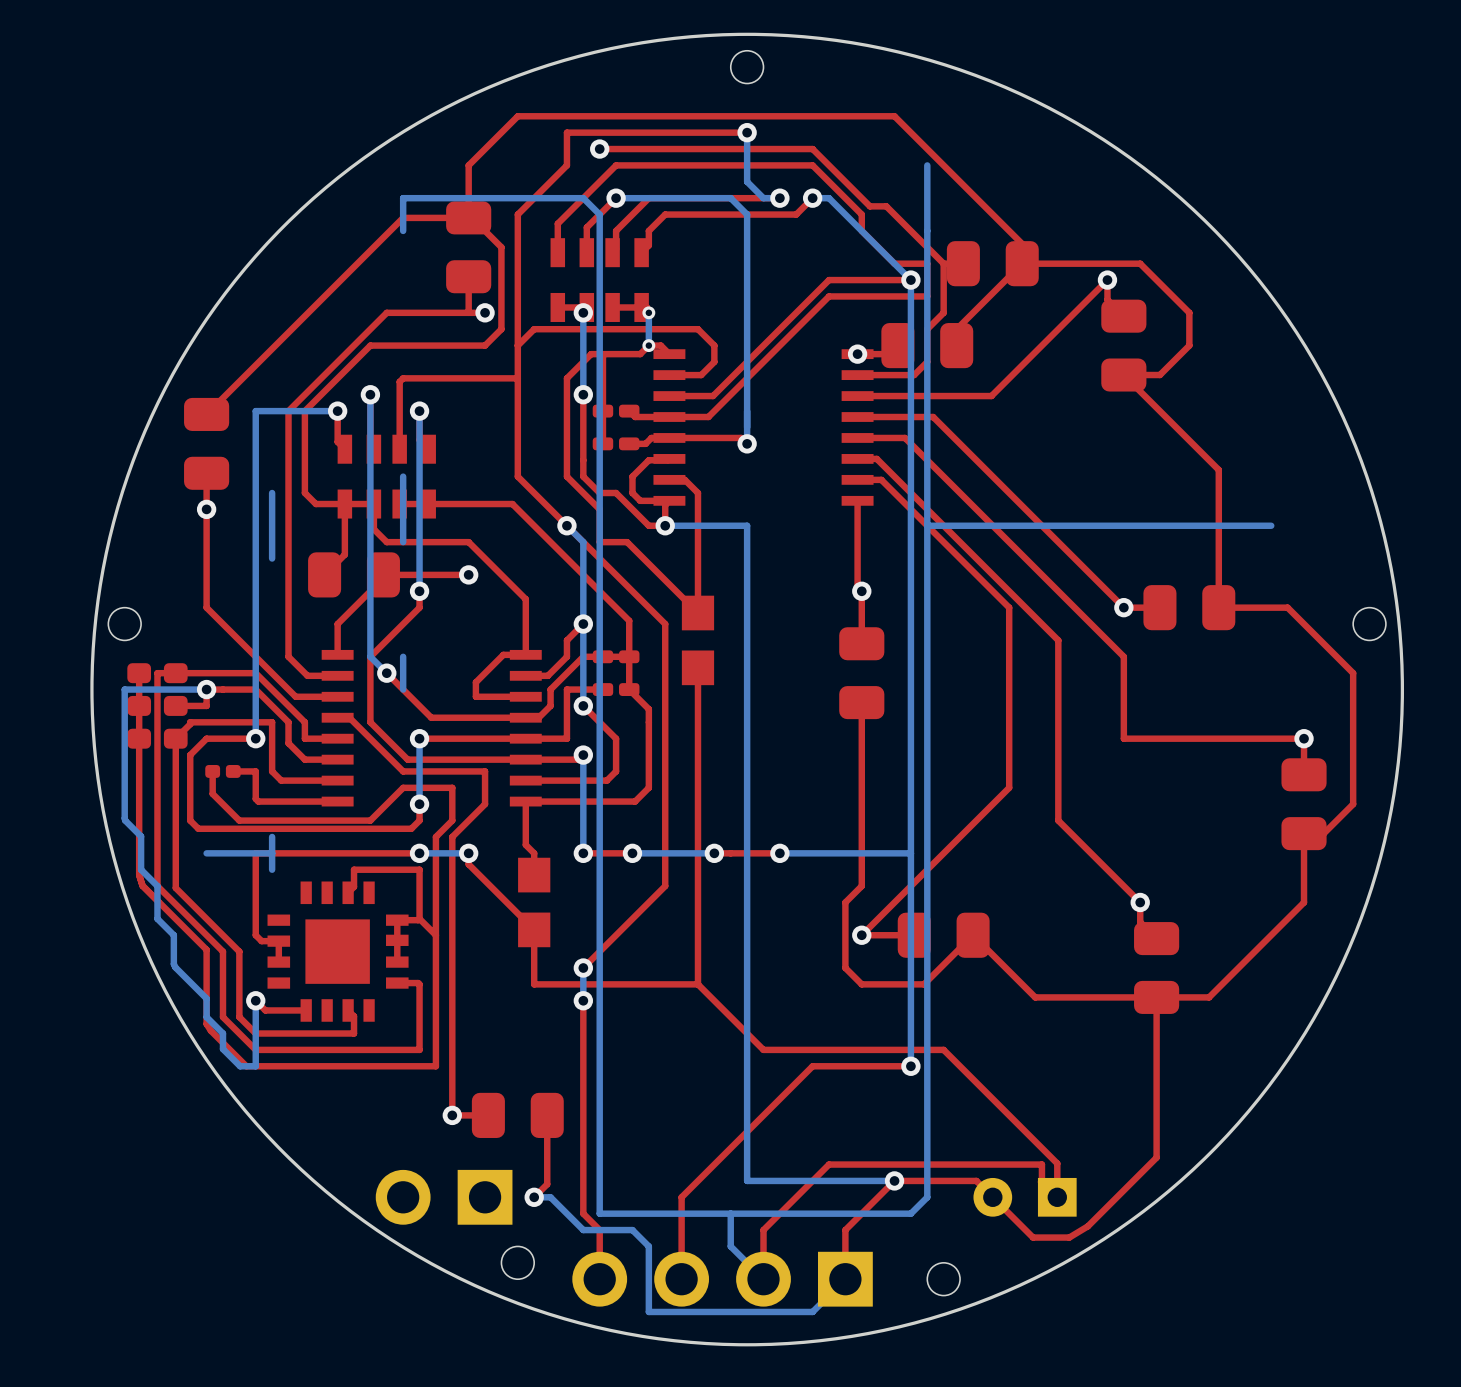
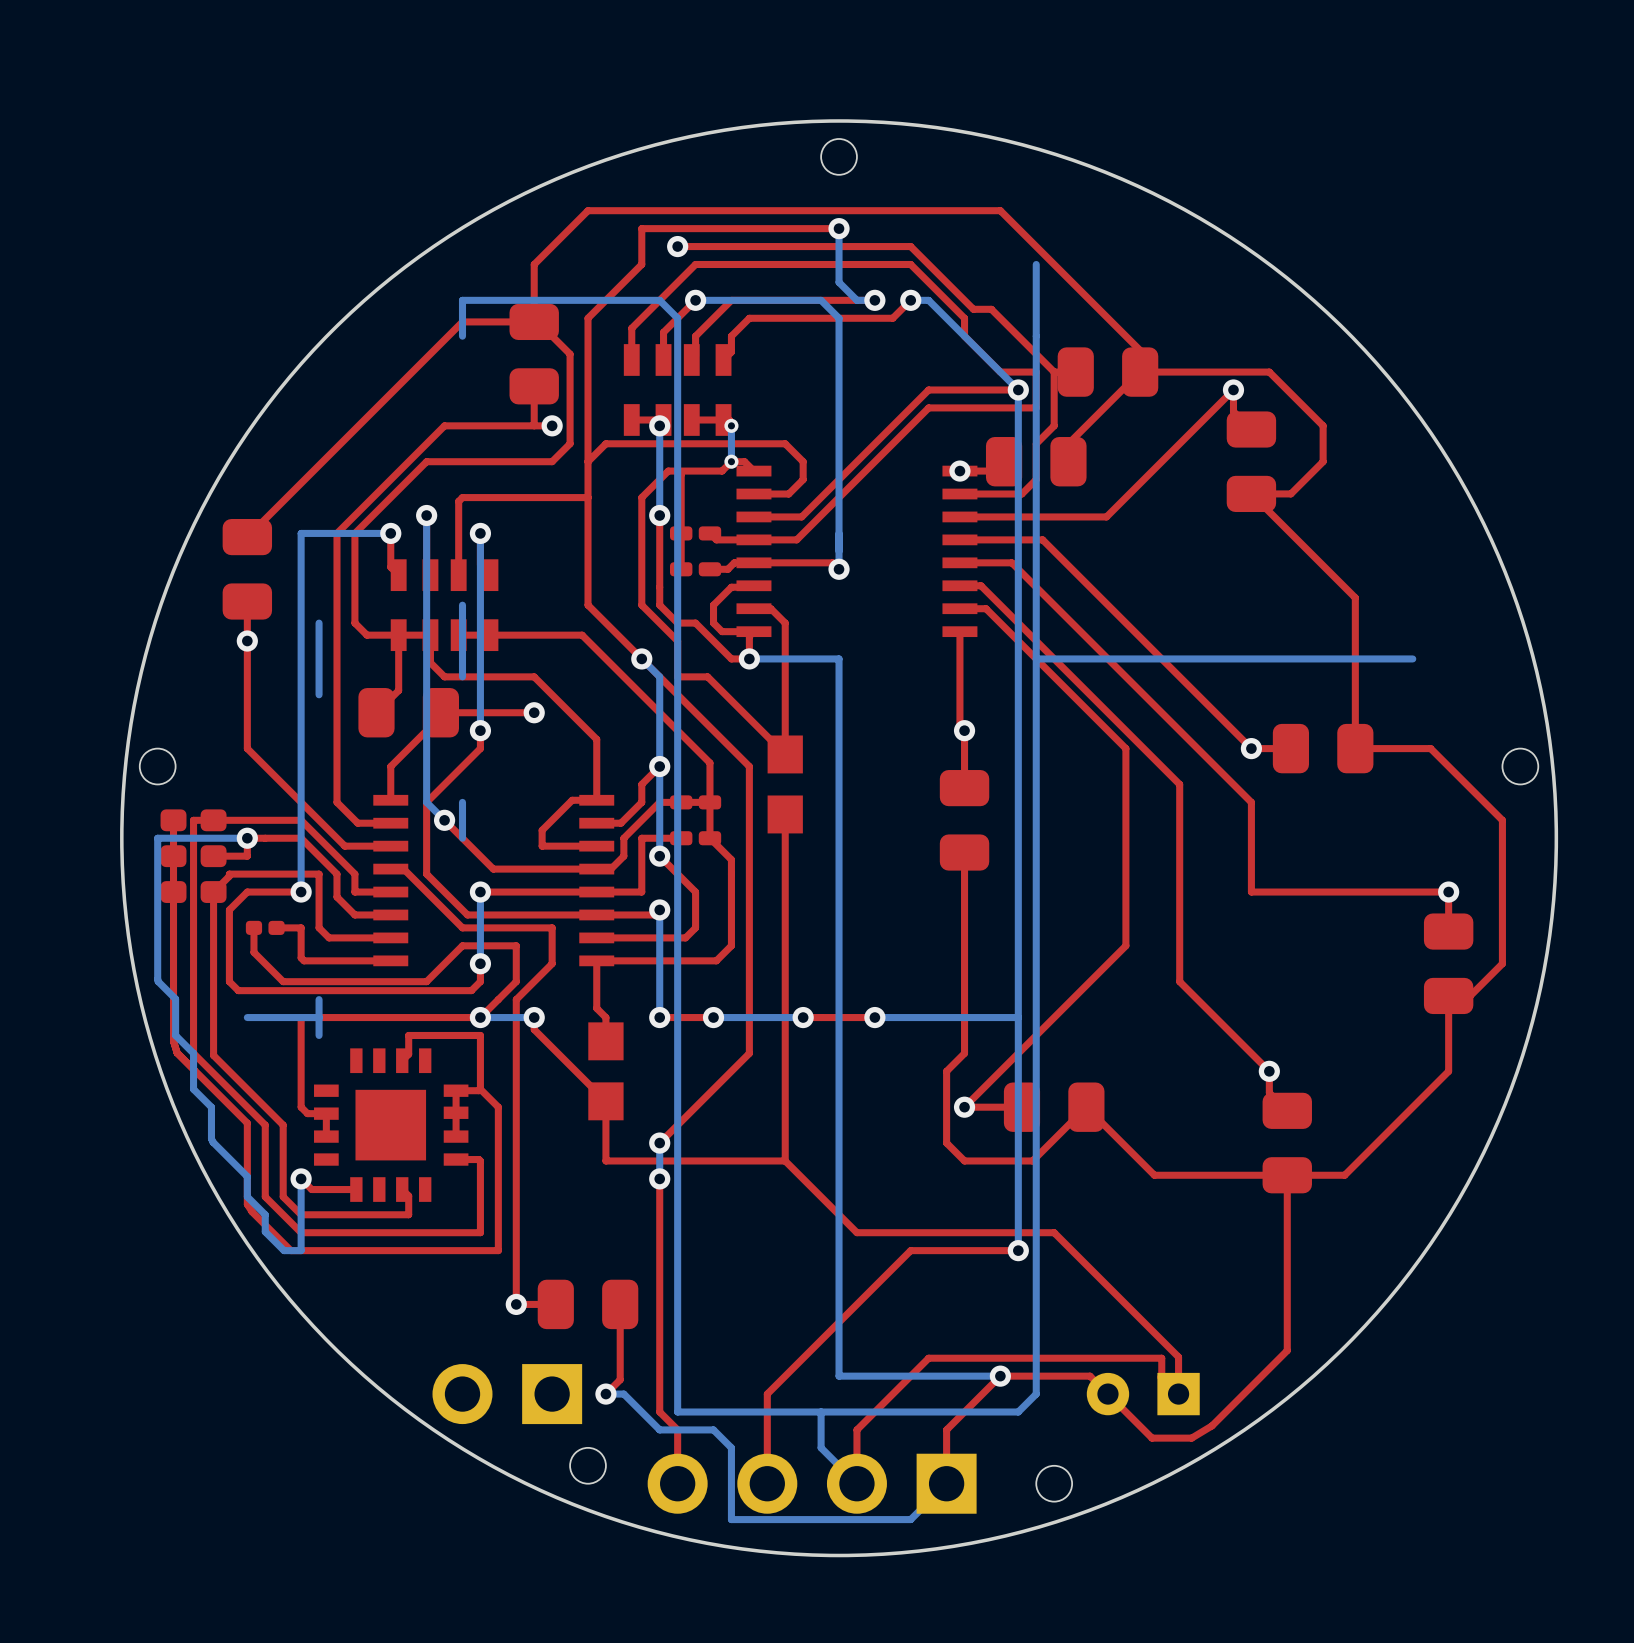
top track: (435, 836) (435, 935) -> (498, 999) (480, 1017)

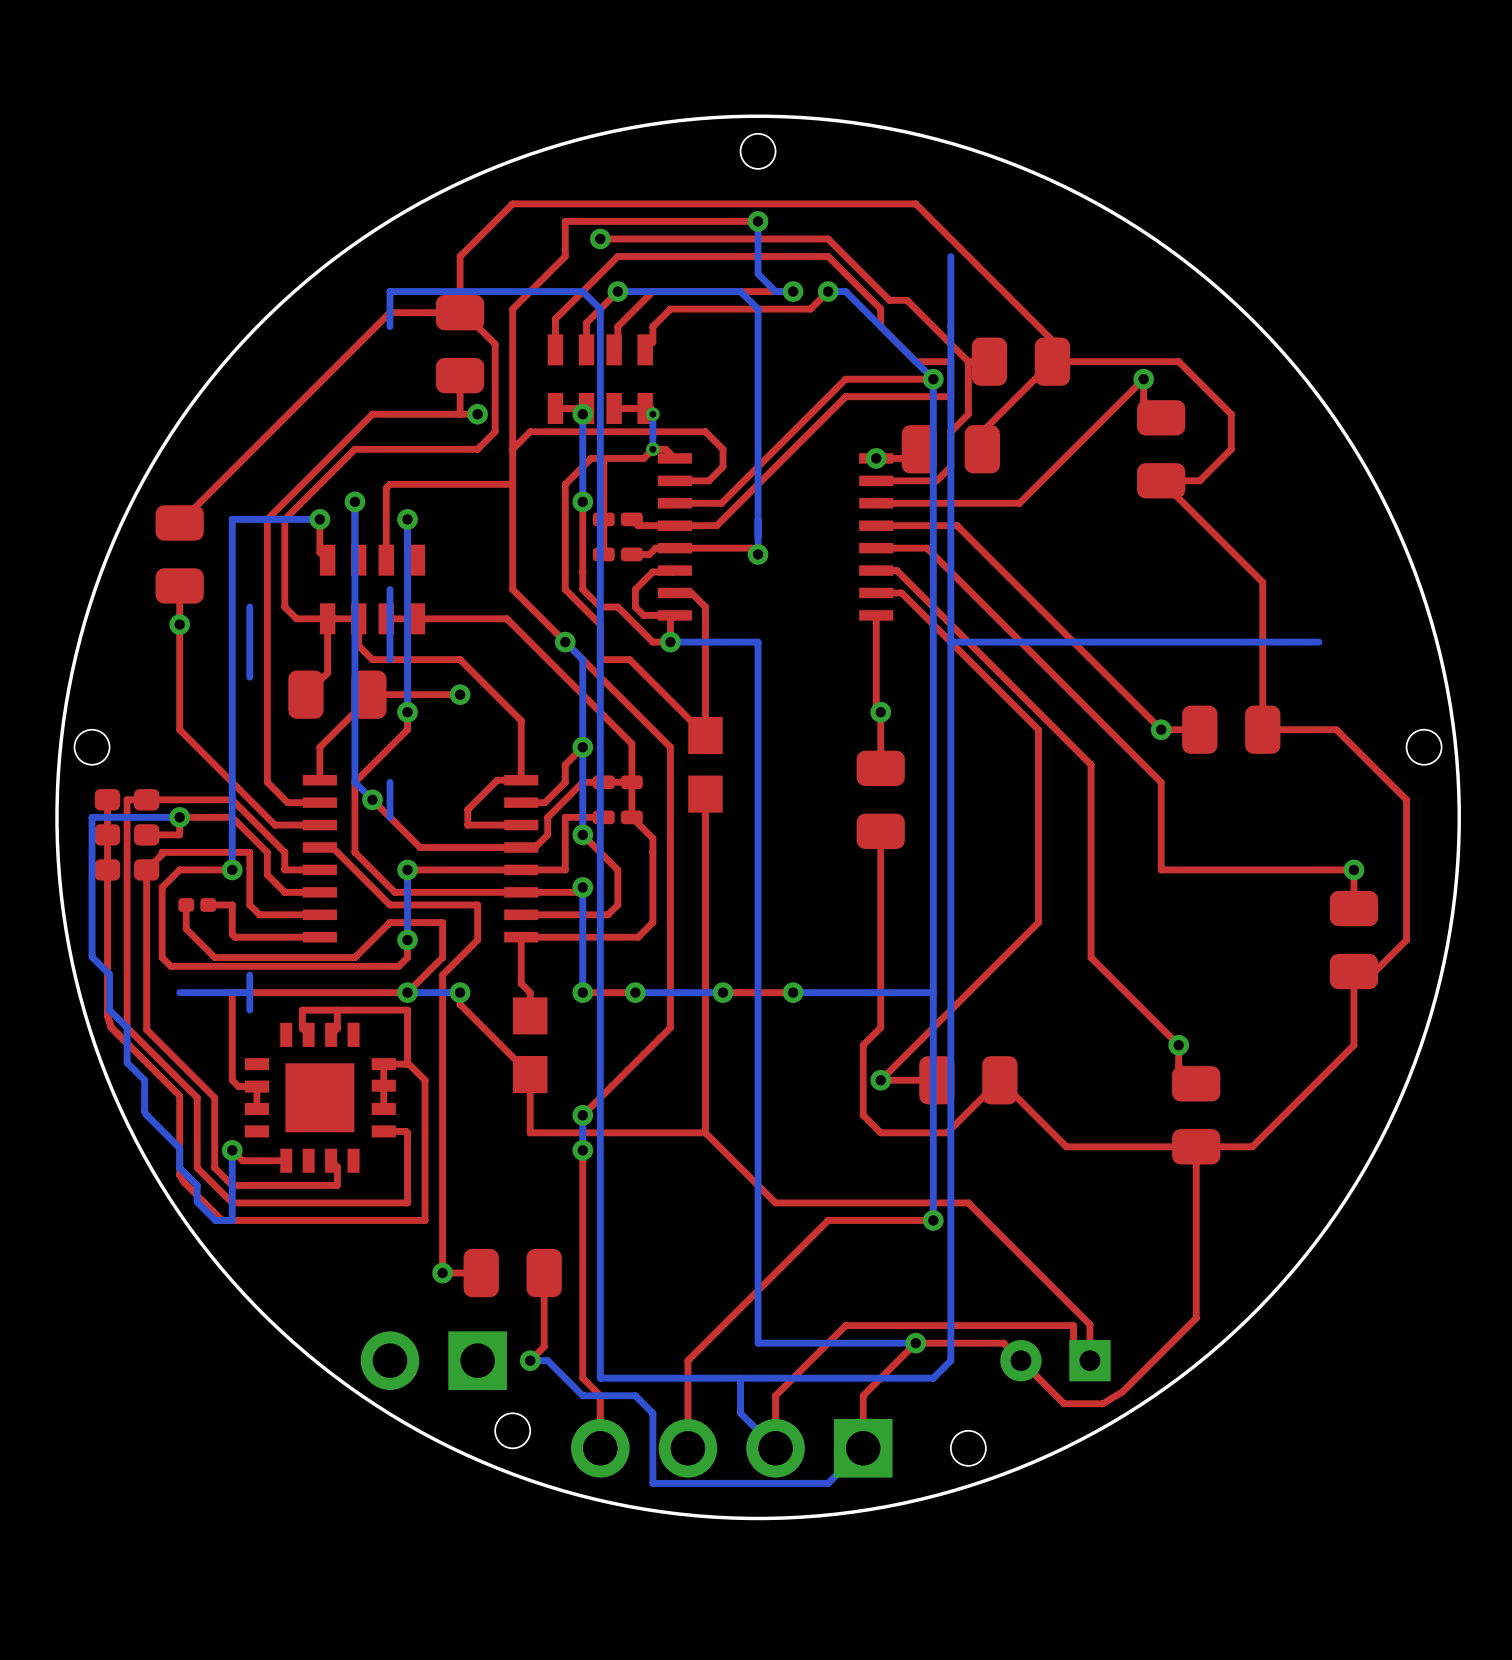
top track: none -> (337, 1010) (302, 1010) (302, 1028) (308, 1034)

